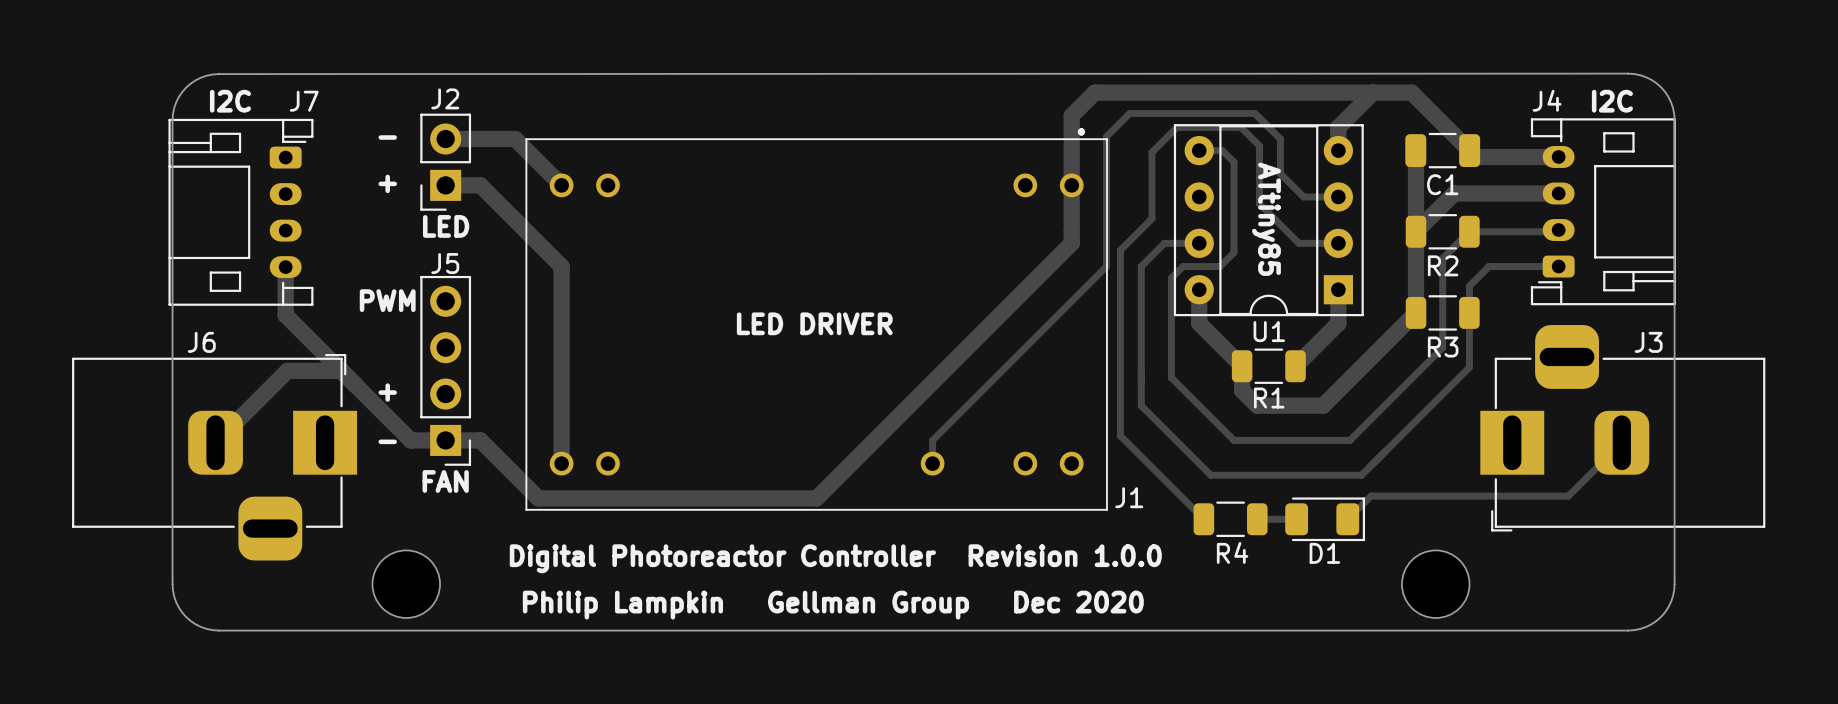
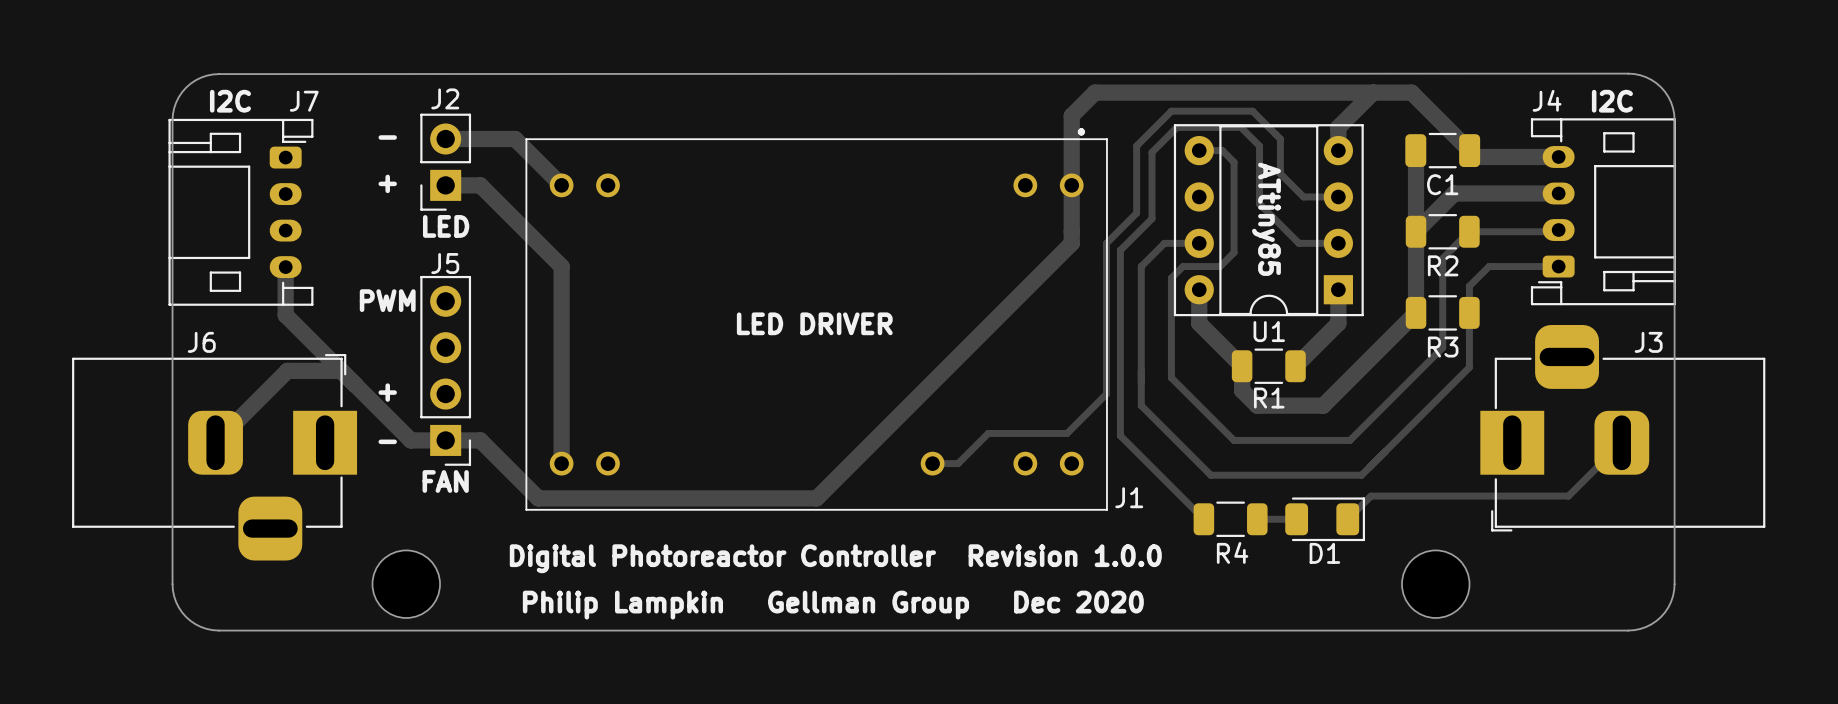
track: (1254, 113) (1129, 113) (1106, 136) (1106, 243) -> (1254, 113) (1252, 111) (1171, 111) (1136, 145) (1136, 213) (1106, 243)
track: (1106, 266) (932, 440) (932, 463) -> (1106, 266) (1106, 394) (1067, 433) (988, 433) (958, 463) (932, 463)

